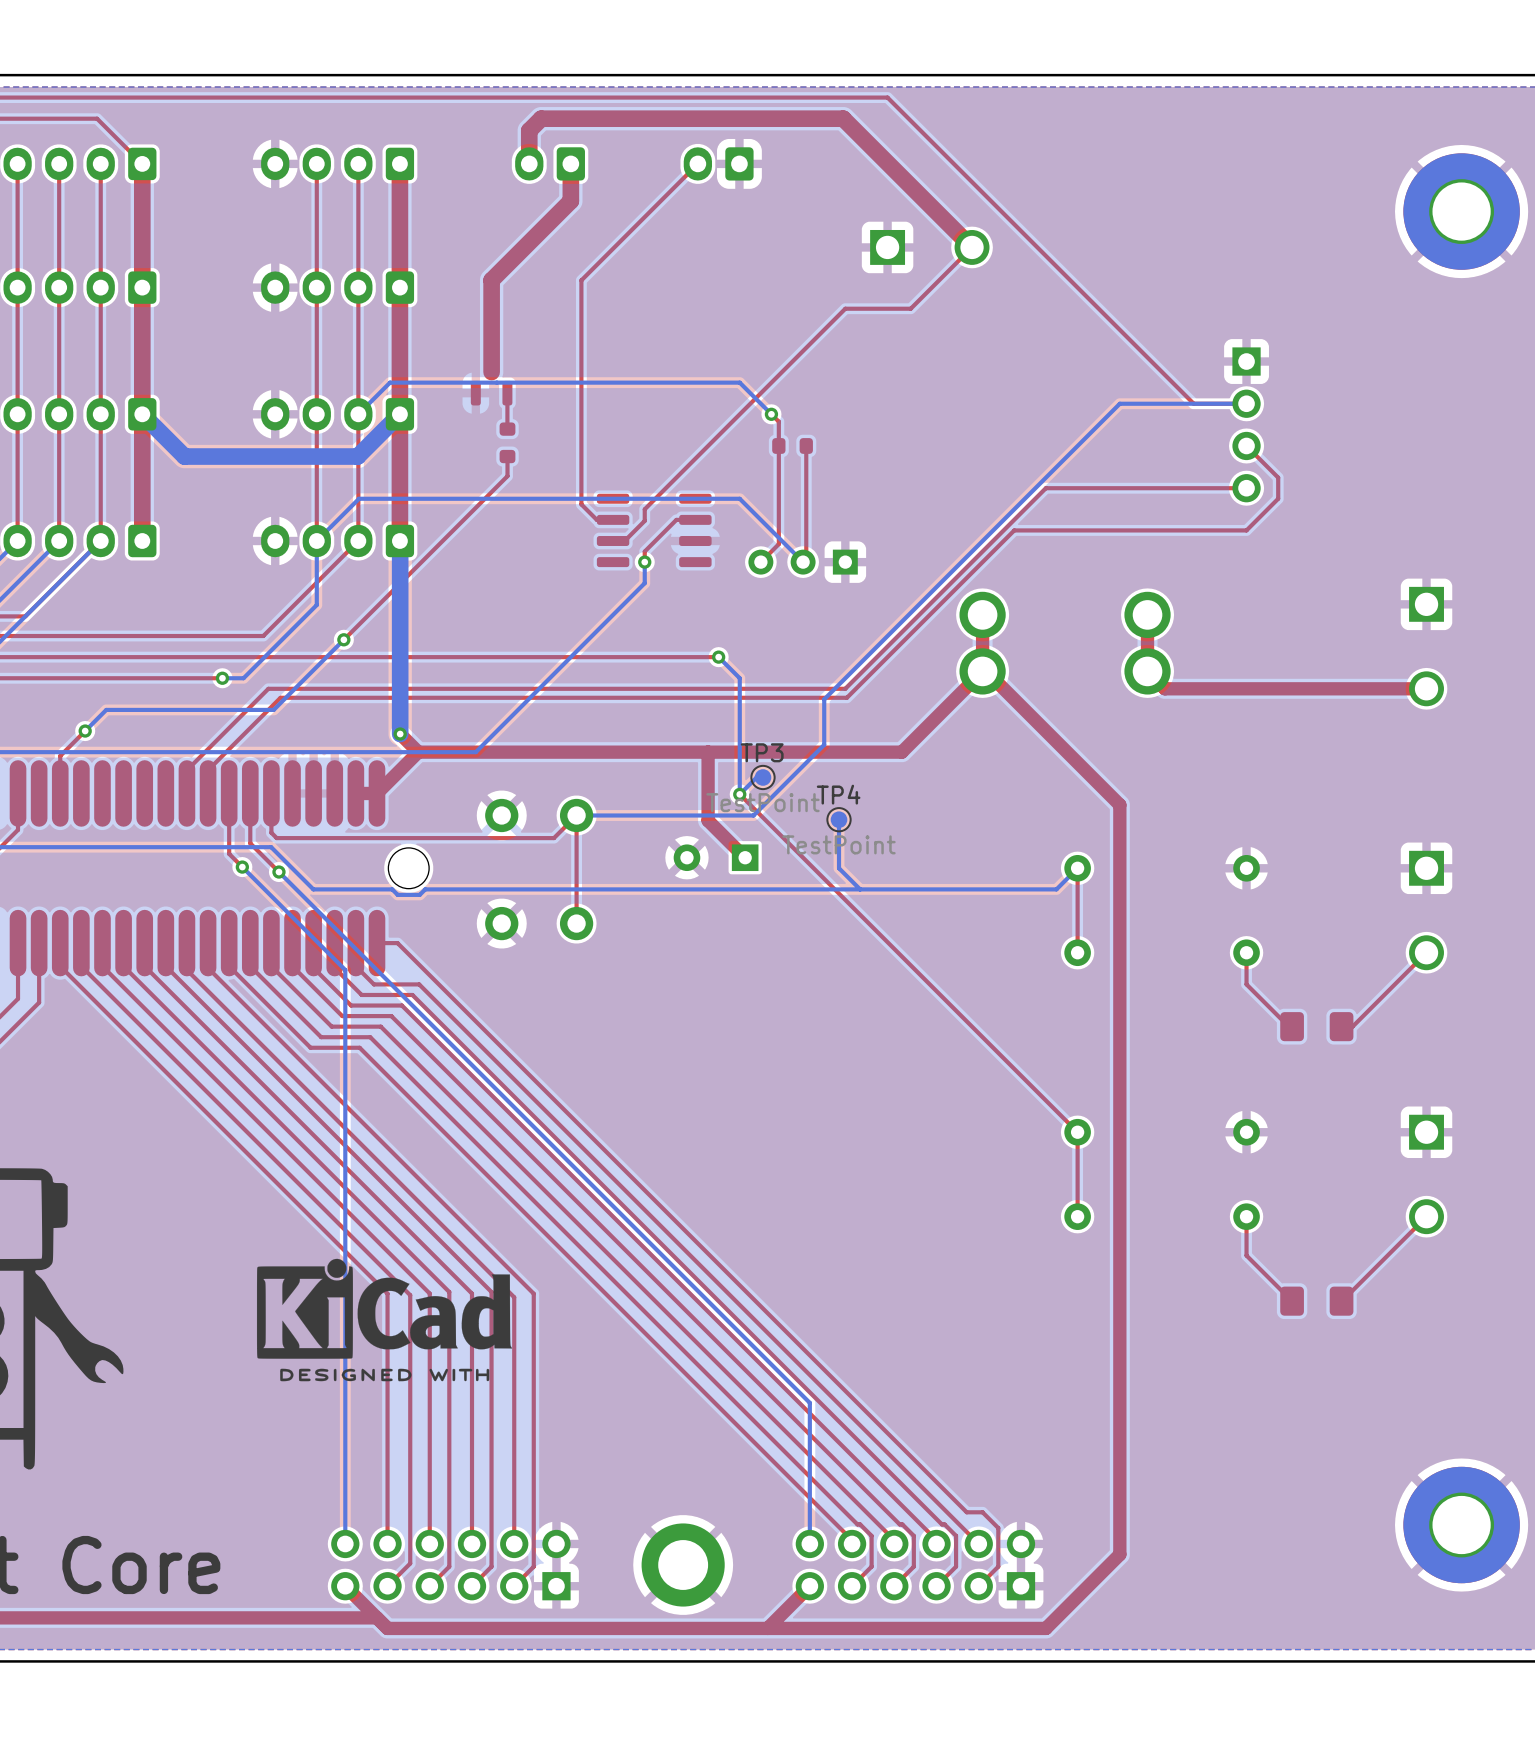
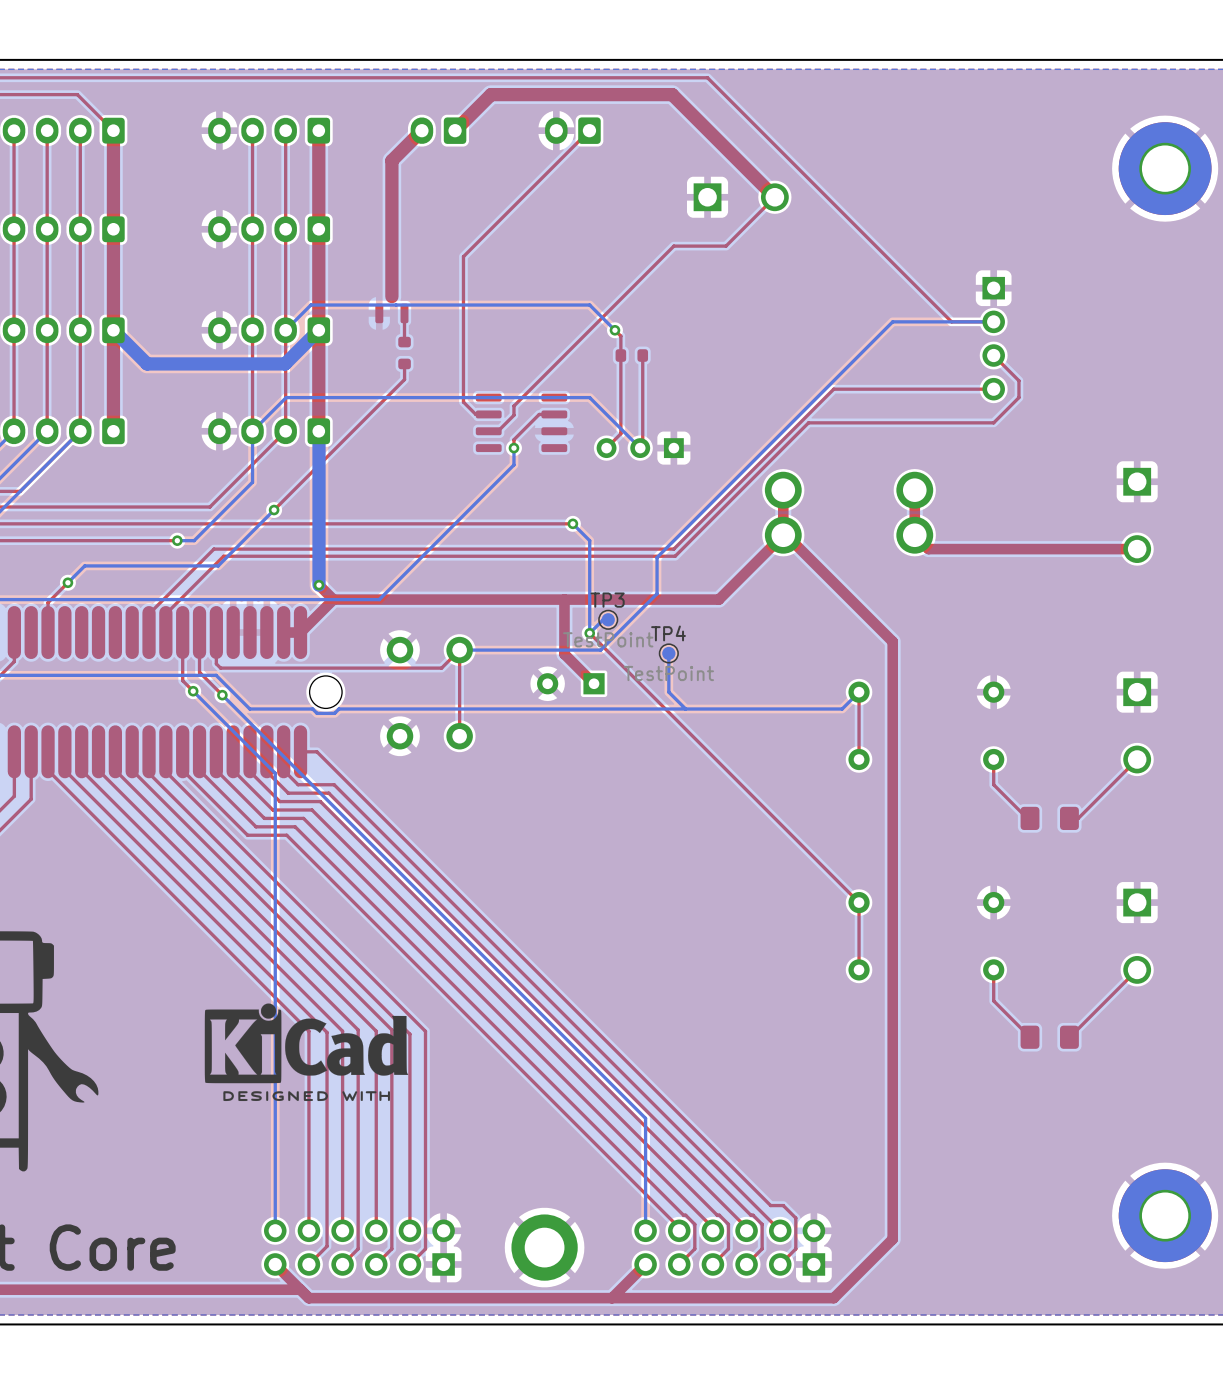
top track: (616, 118) (541, 118) (529, 130) (529, 163) -> (491, 94) (455, 130)
top track: (570, 163) (570, 201) (491, 280) -> (421, 130) (391, 160) (391, 223)
top track: (697, 163) (581, 280) (581, 321) -> (589, 130) (463, 256)

